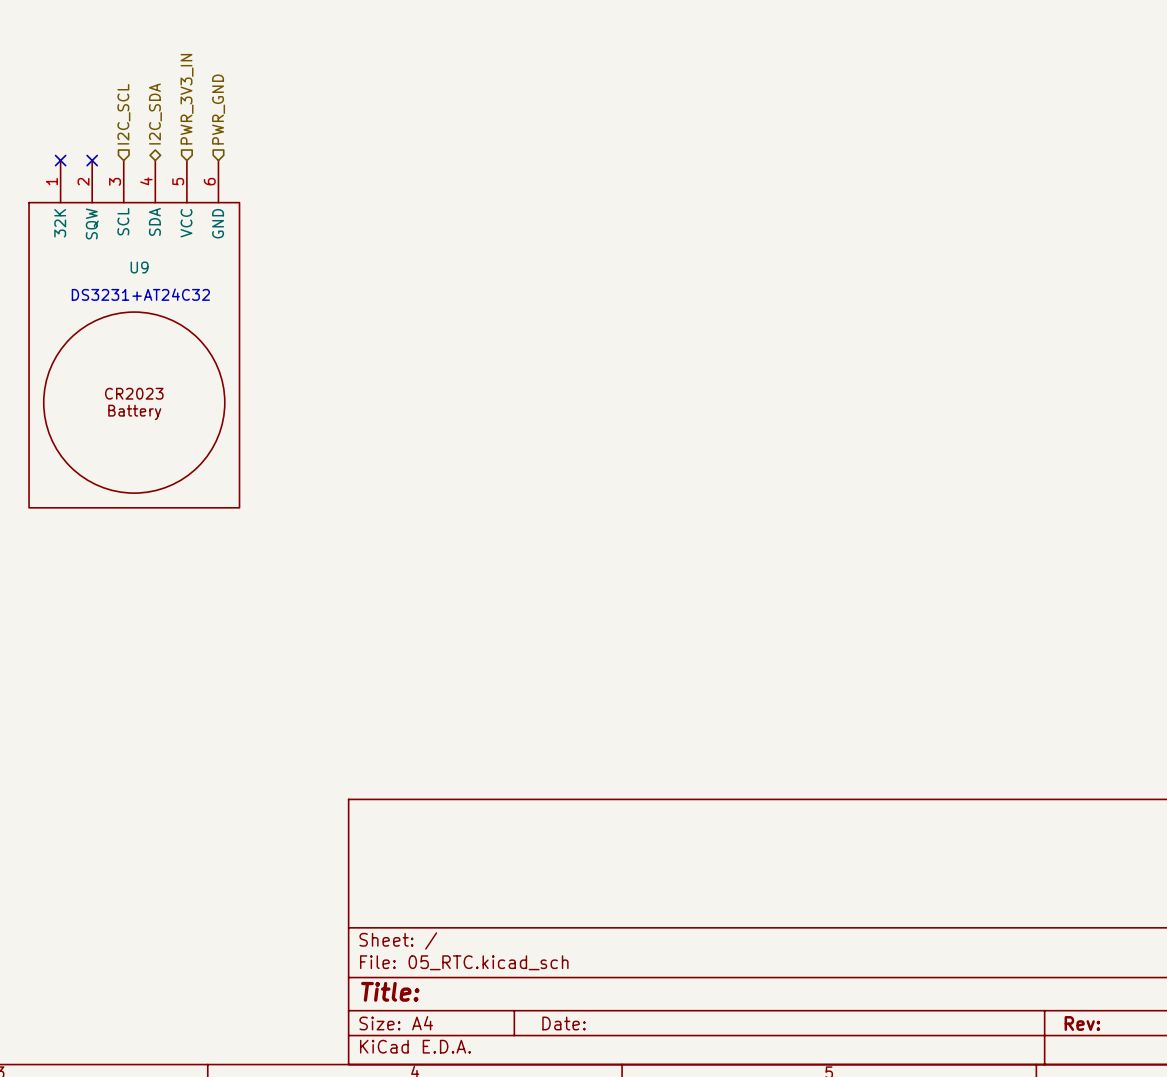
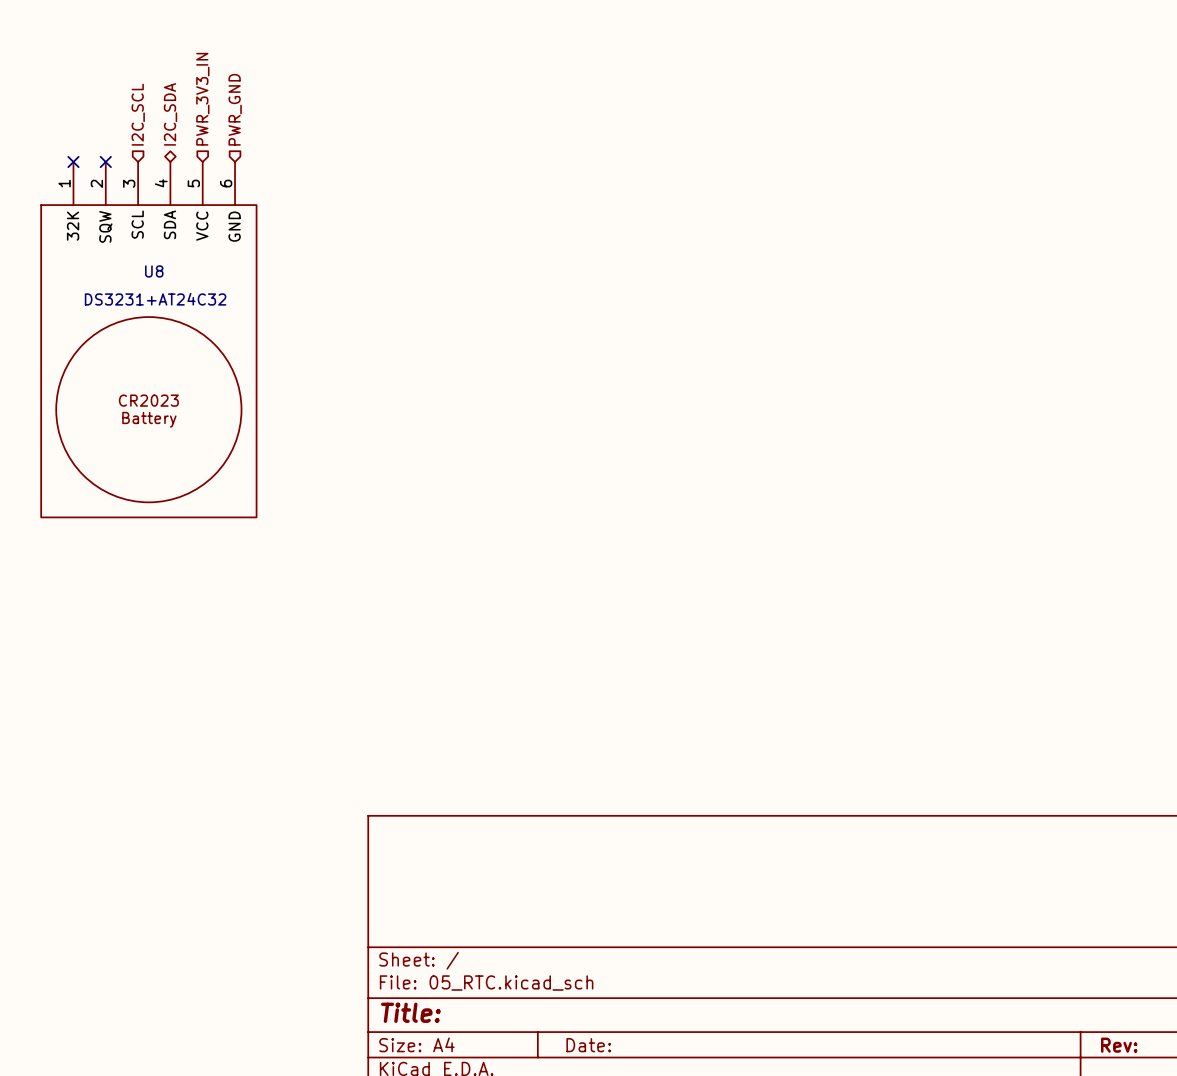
U9 name: U9 (139, 267) -> U8 (154, 271)

